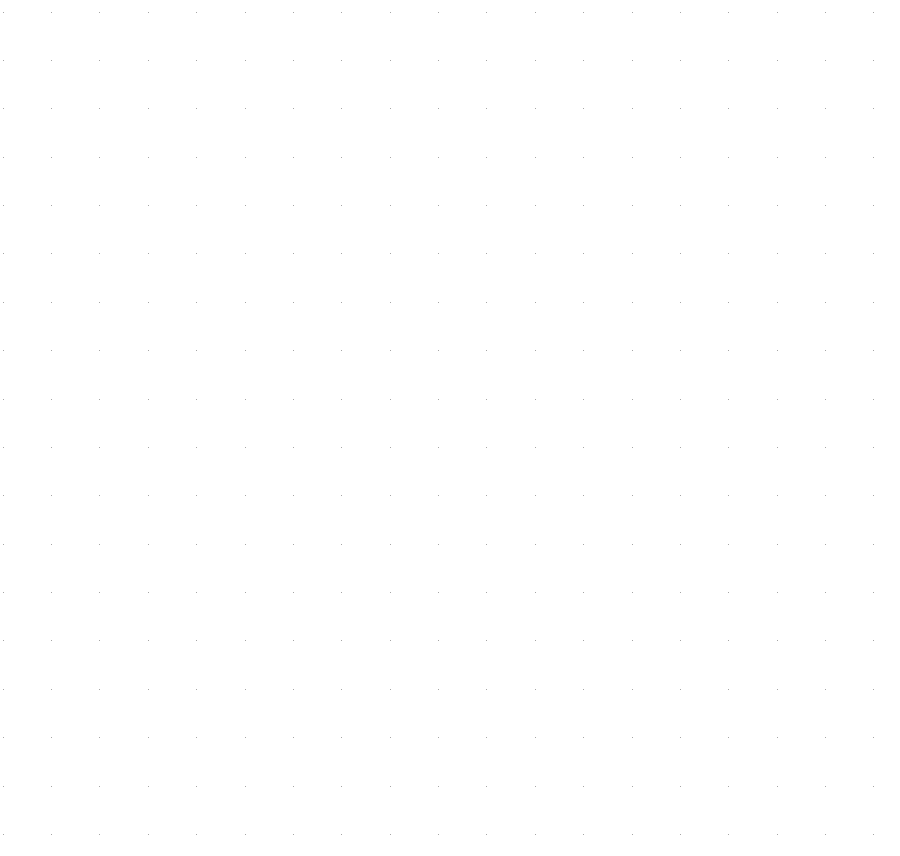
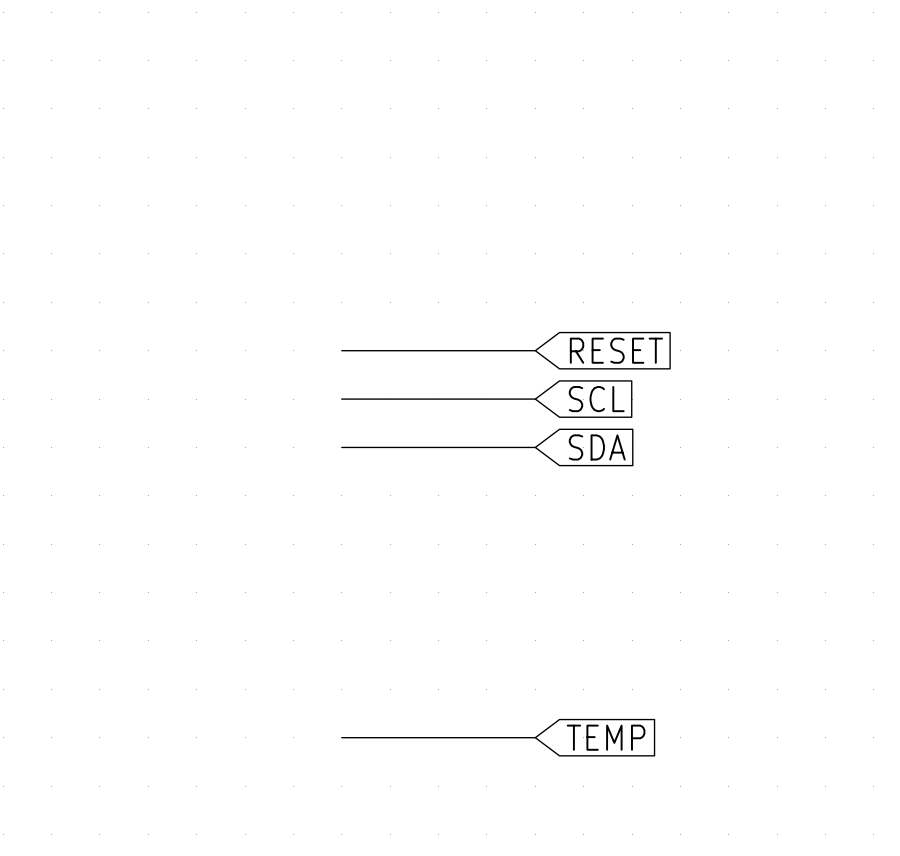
wire: none -> (341, 350) (535, 350)
global label: none -> RESET (616, 350)
wire: none -> (341, 399) (535, 399)
global label: none -> SCL (596, 399)
wire: none -> (341, 447) (535, 447)
global label: none -> SDA (597, 447)
wire: none -> (341, 737) (535, 737)
global label: none -> TEMP (606, 737)

